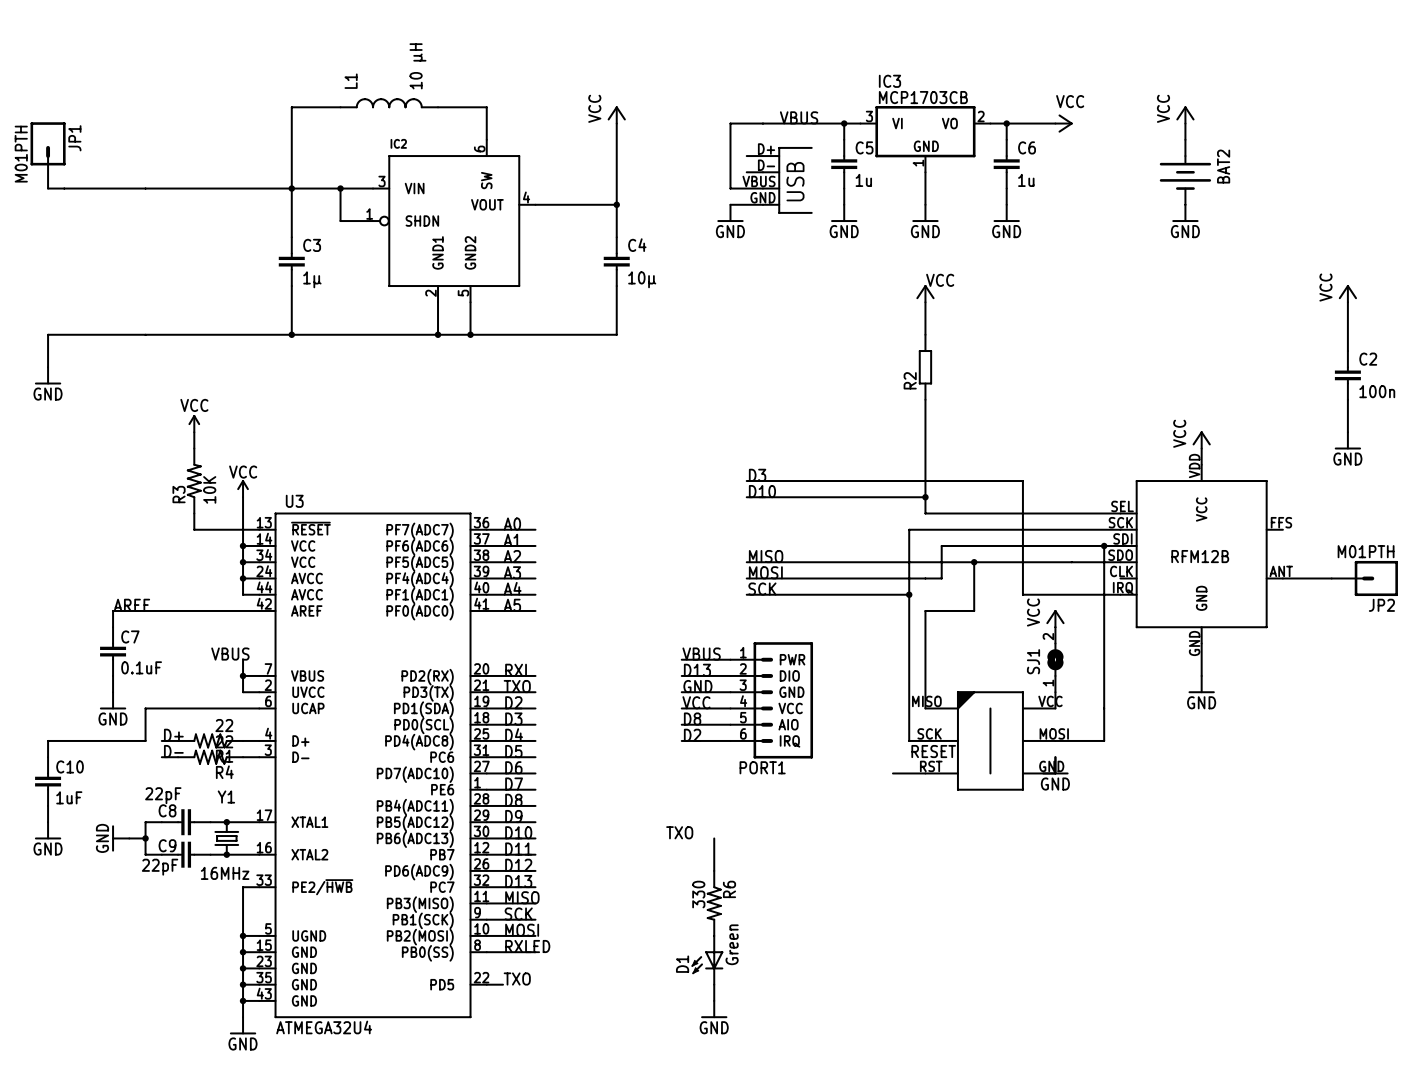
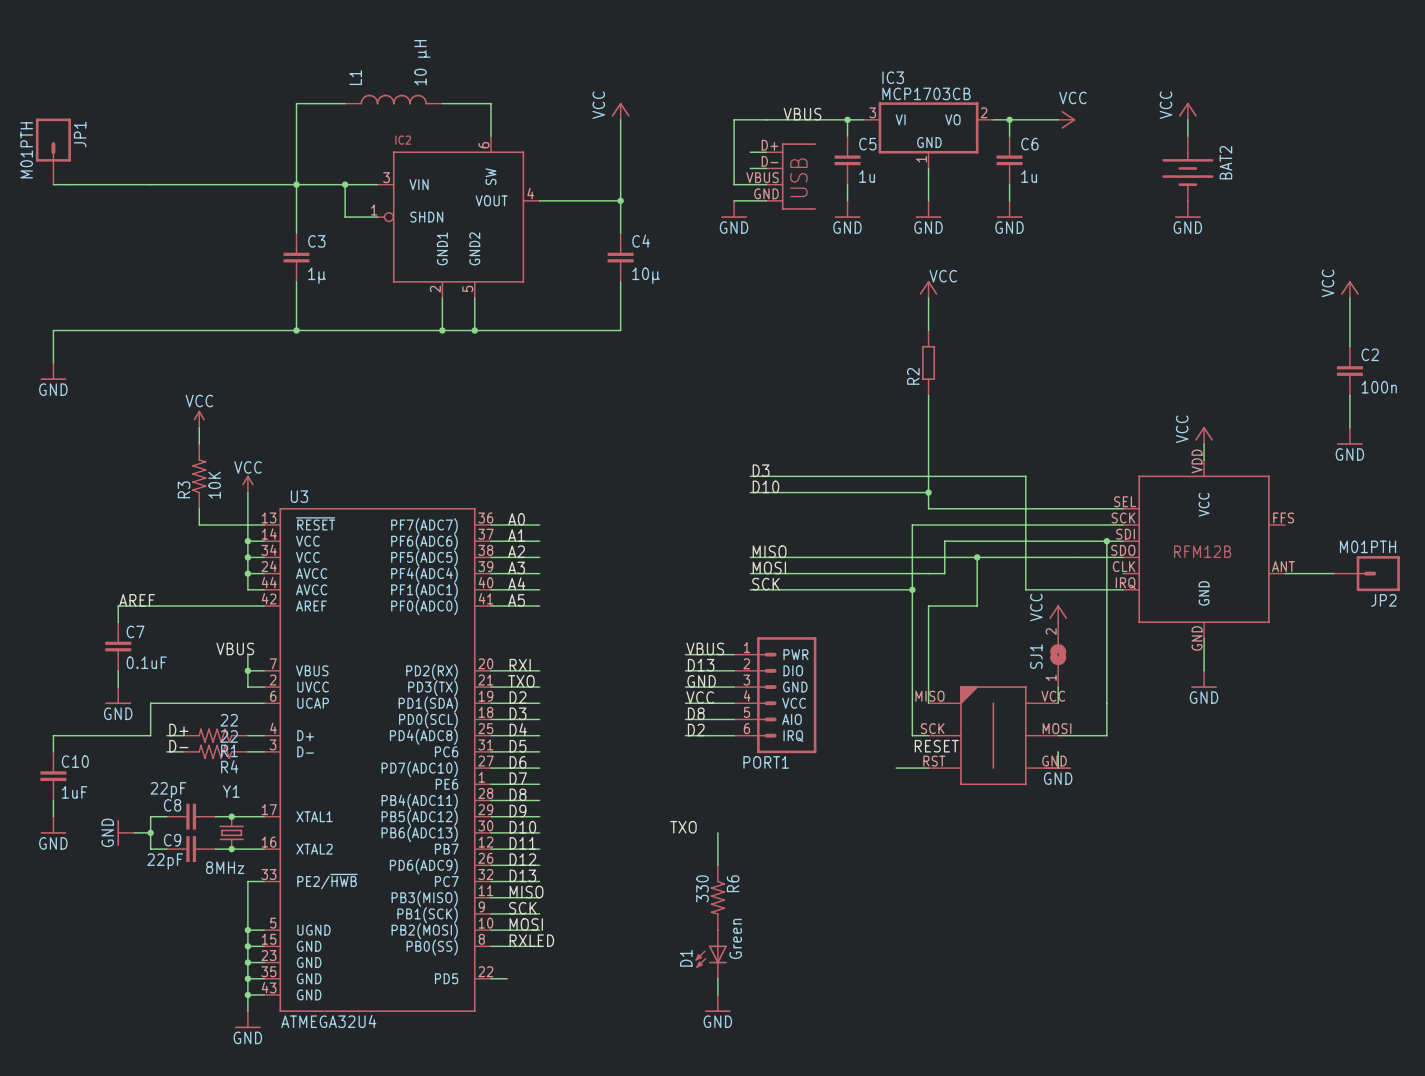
Y1 value: 16MHz (225, 873) -> 8MHz (225, 867)
label: TXO (517, 979) -> none

